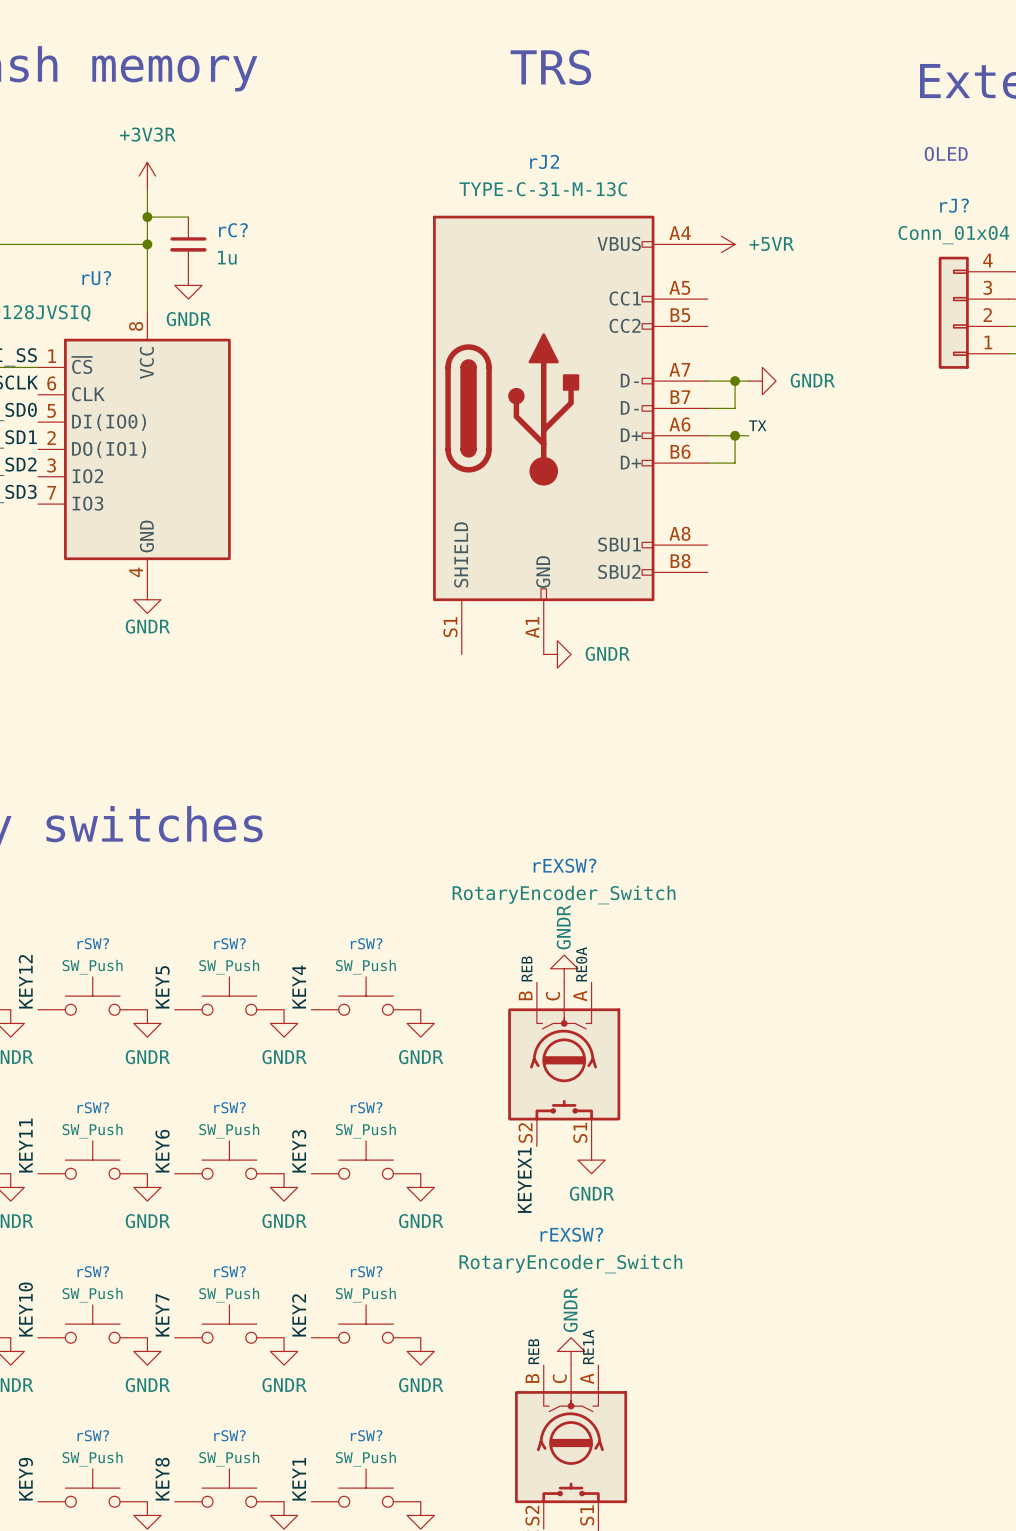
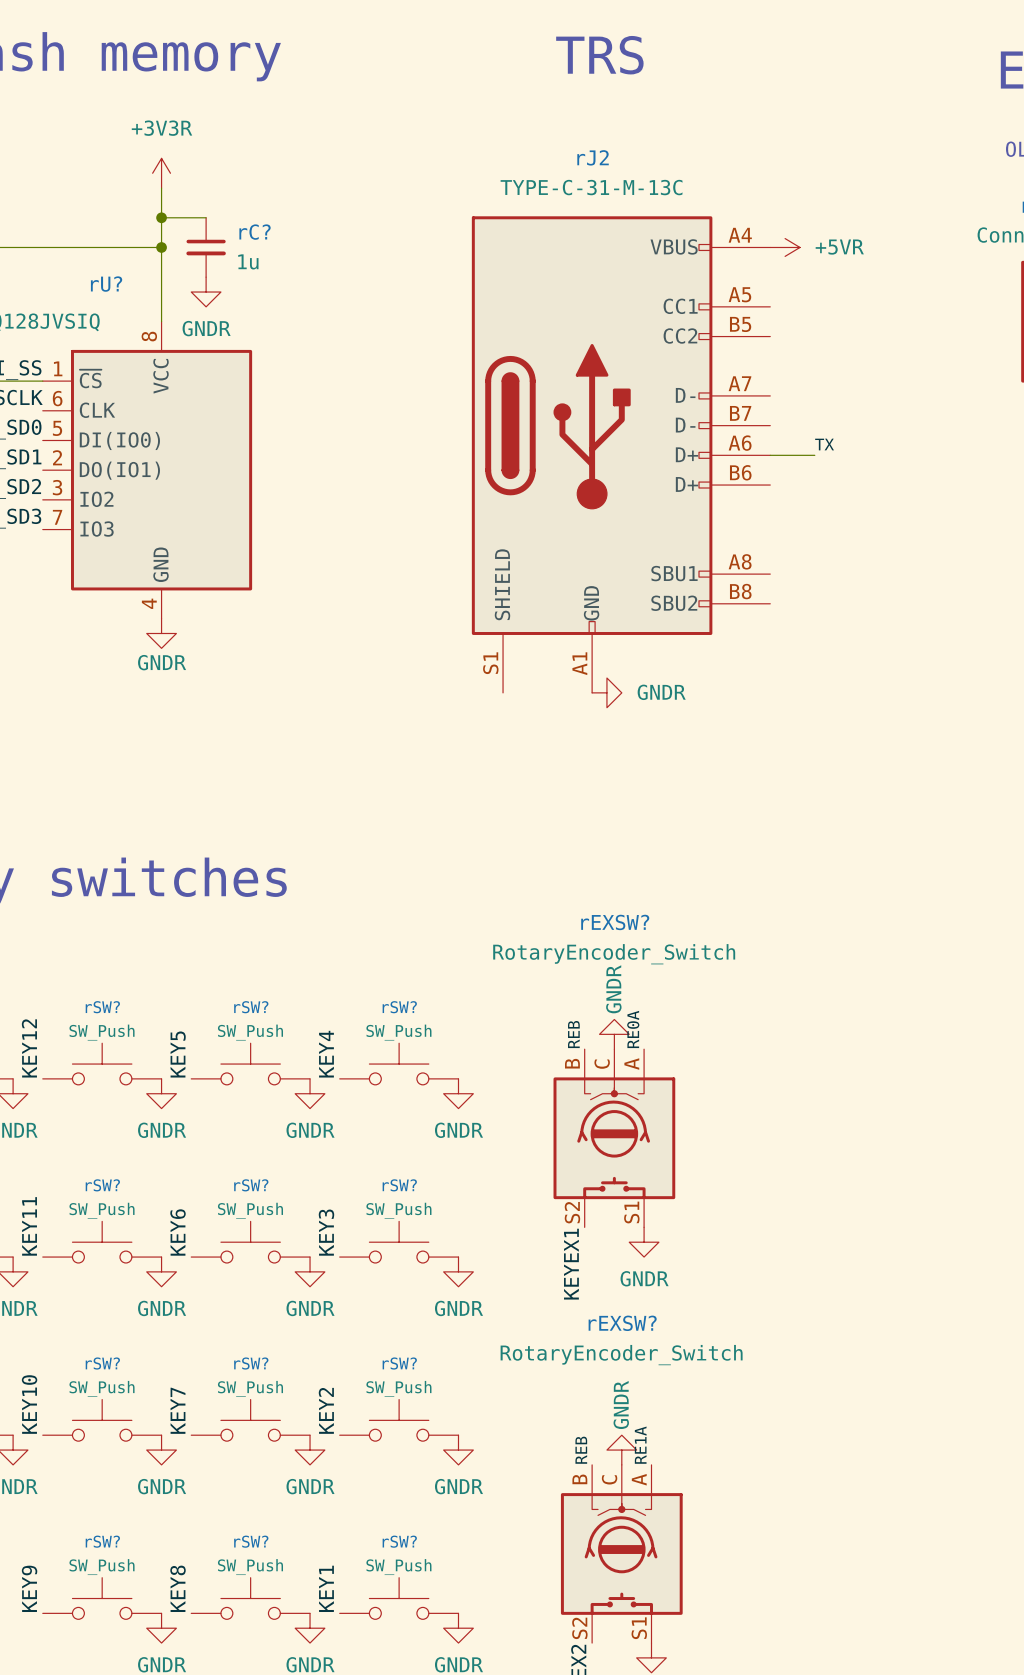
wire: (707, 381) (748, 381) -> none
wire: (735, 381) (735, 408) (707, 408) -> none
junction: (735, 381) -> none
power symbol: GNDR (762, 381) -> none
wire: (735, 435) (735, 463) (707, 463) -> none
junction: (735, 435) -> none

